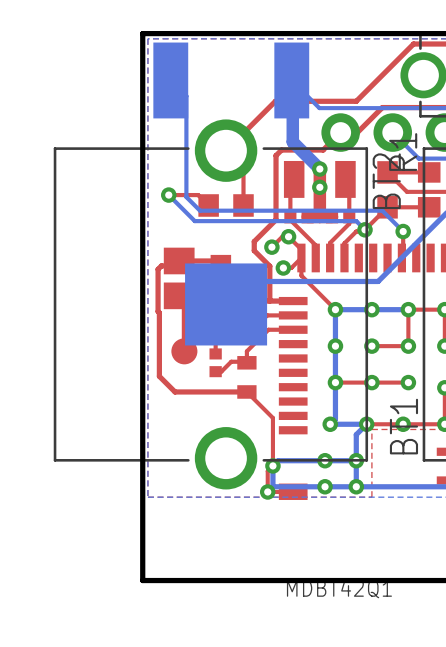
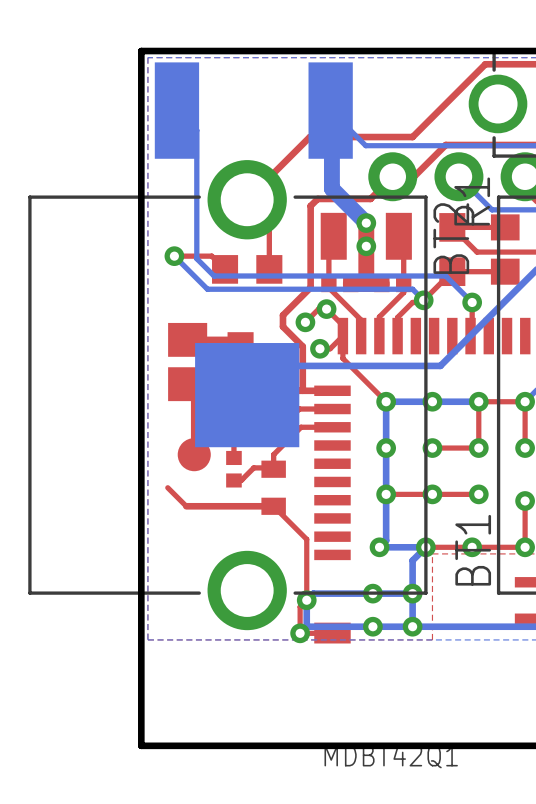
top track: (179, 260) (174, 265) (161, 265) (158, 269) (159, 376) (175, 391) (178, 391) -> (167, 487) (186, 506)

